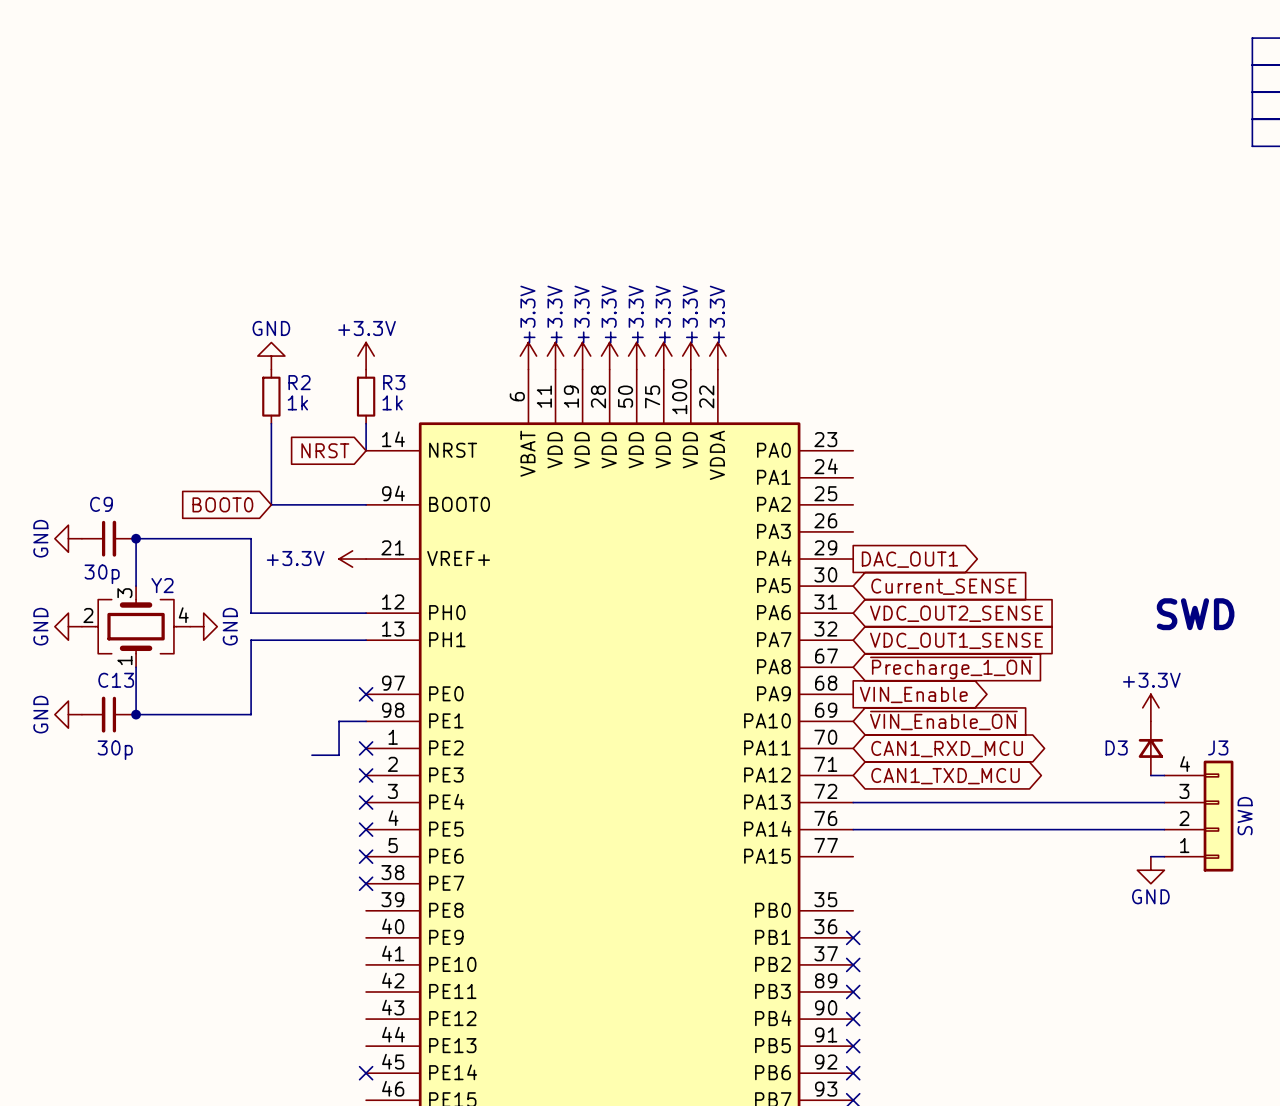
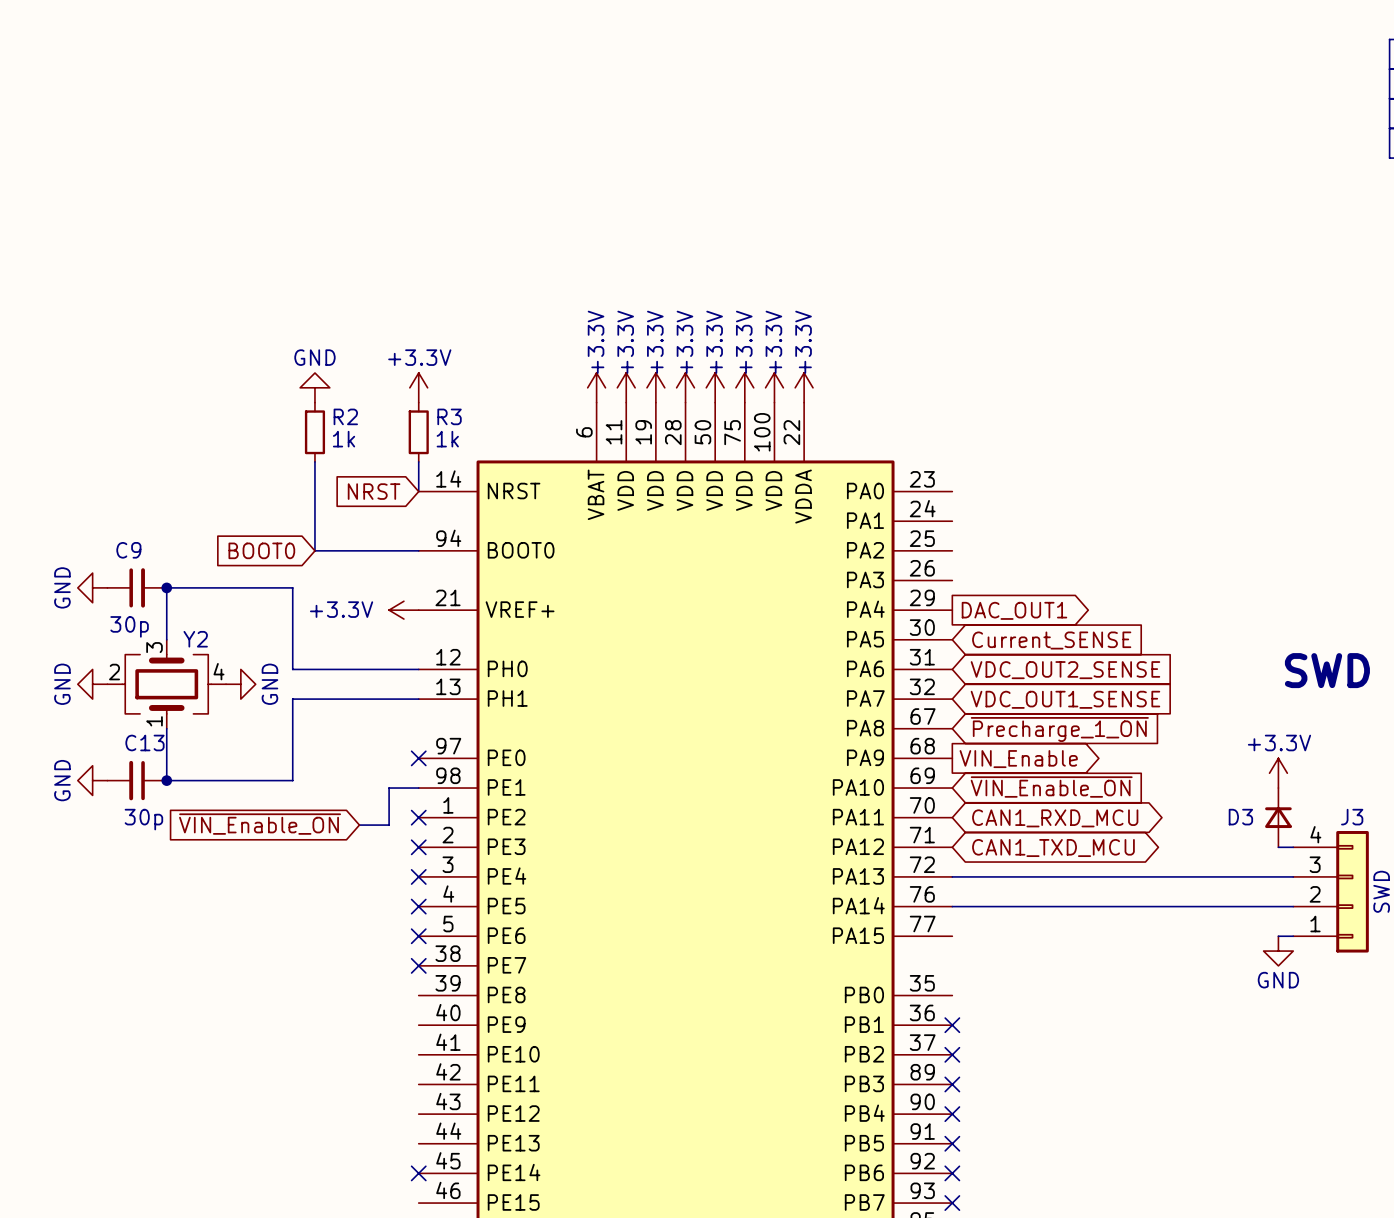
global label: none -> ~{VIN_Enable_ON} (260, 824)

